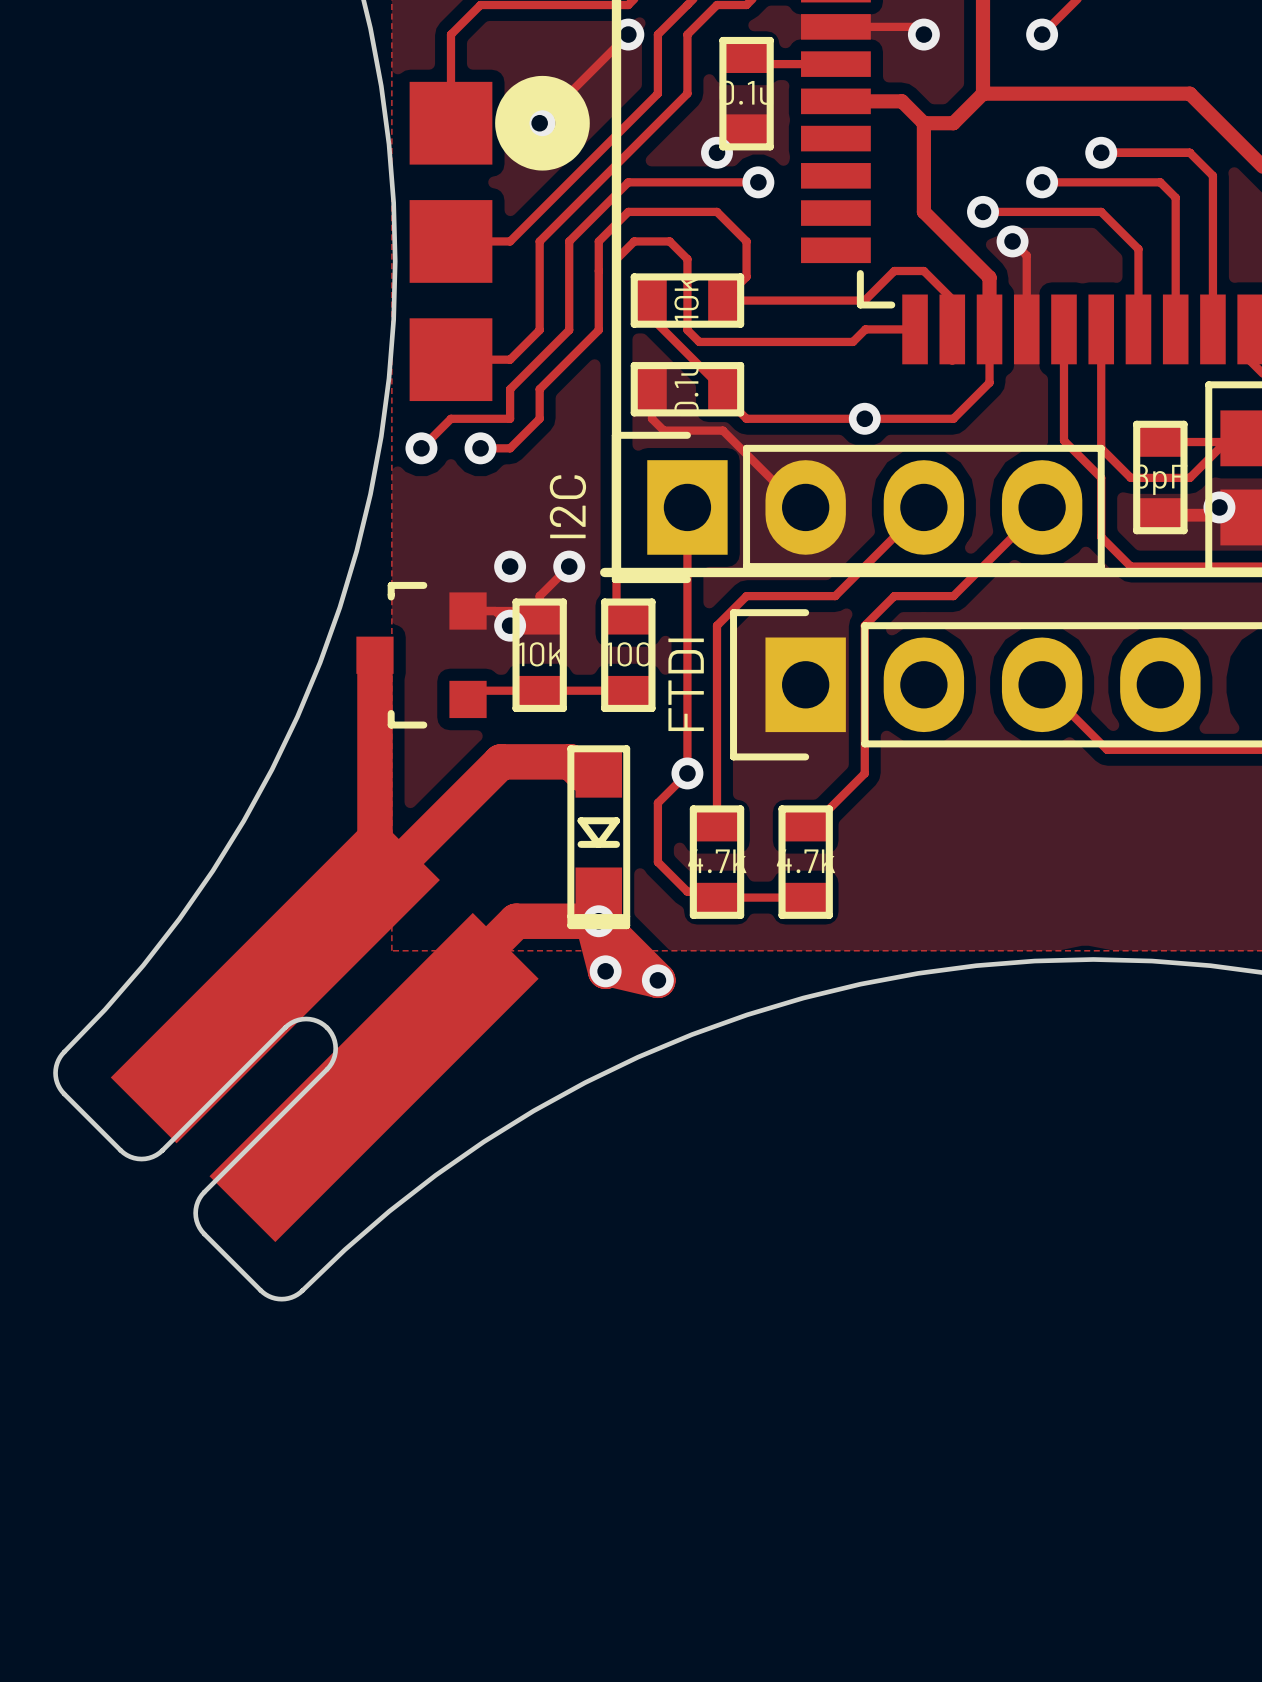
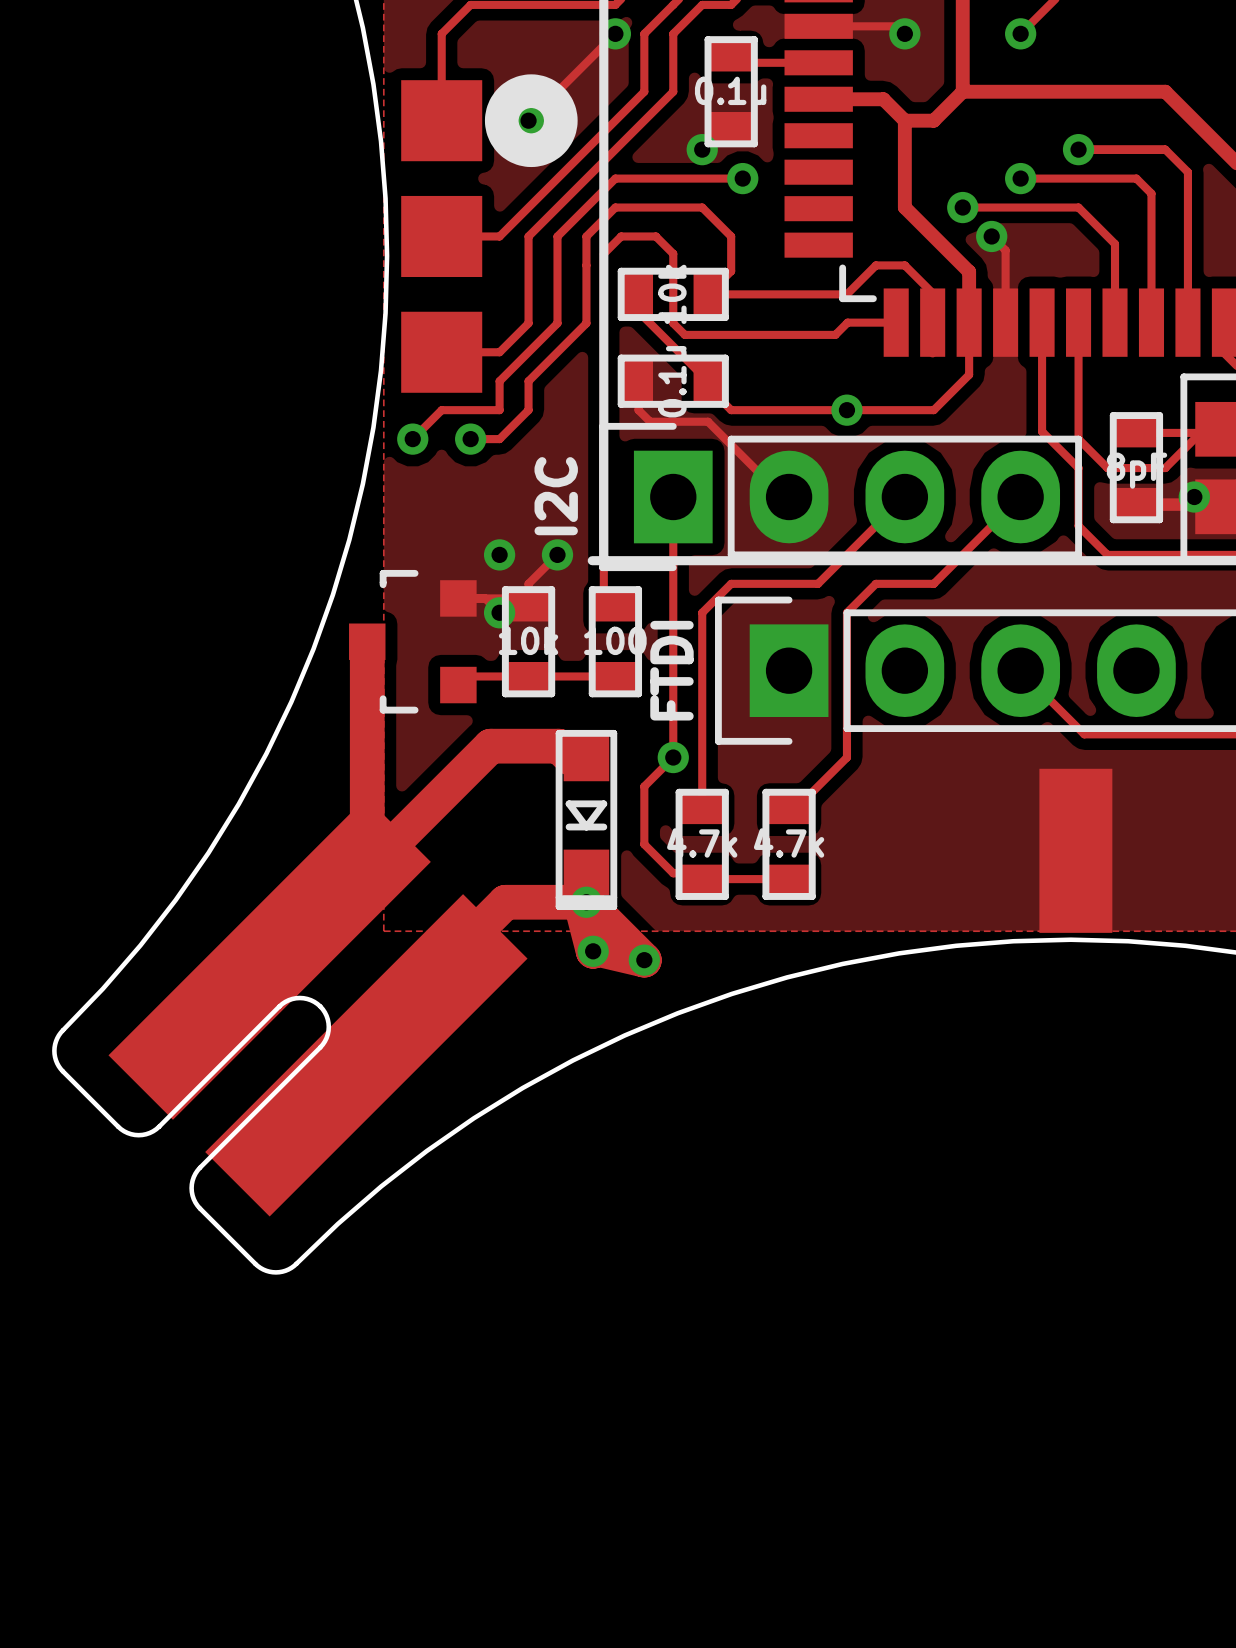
part: none -> (1075, 850)

